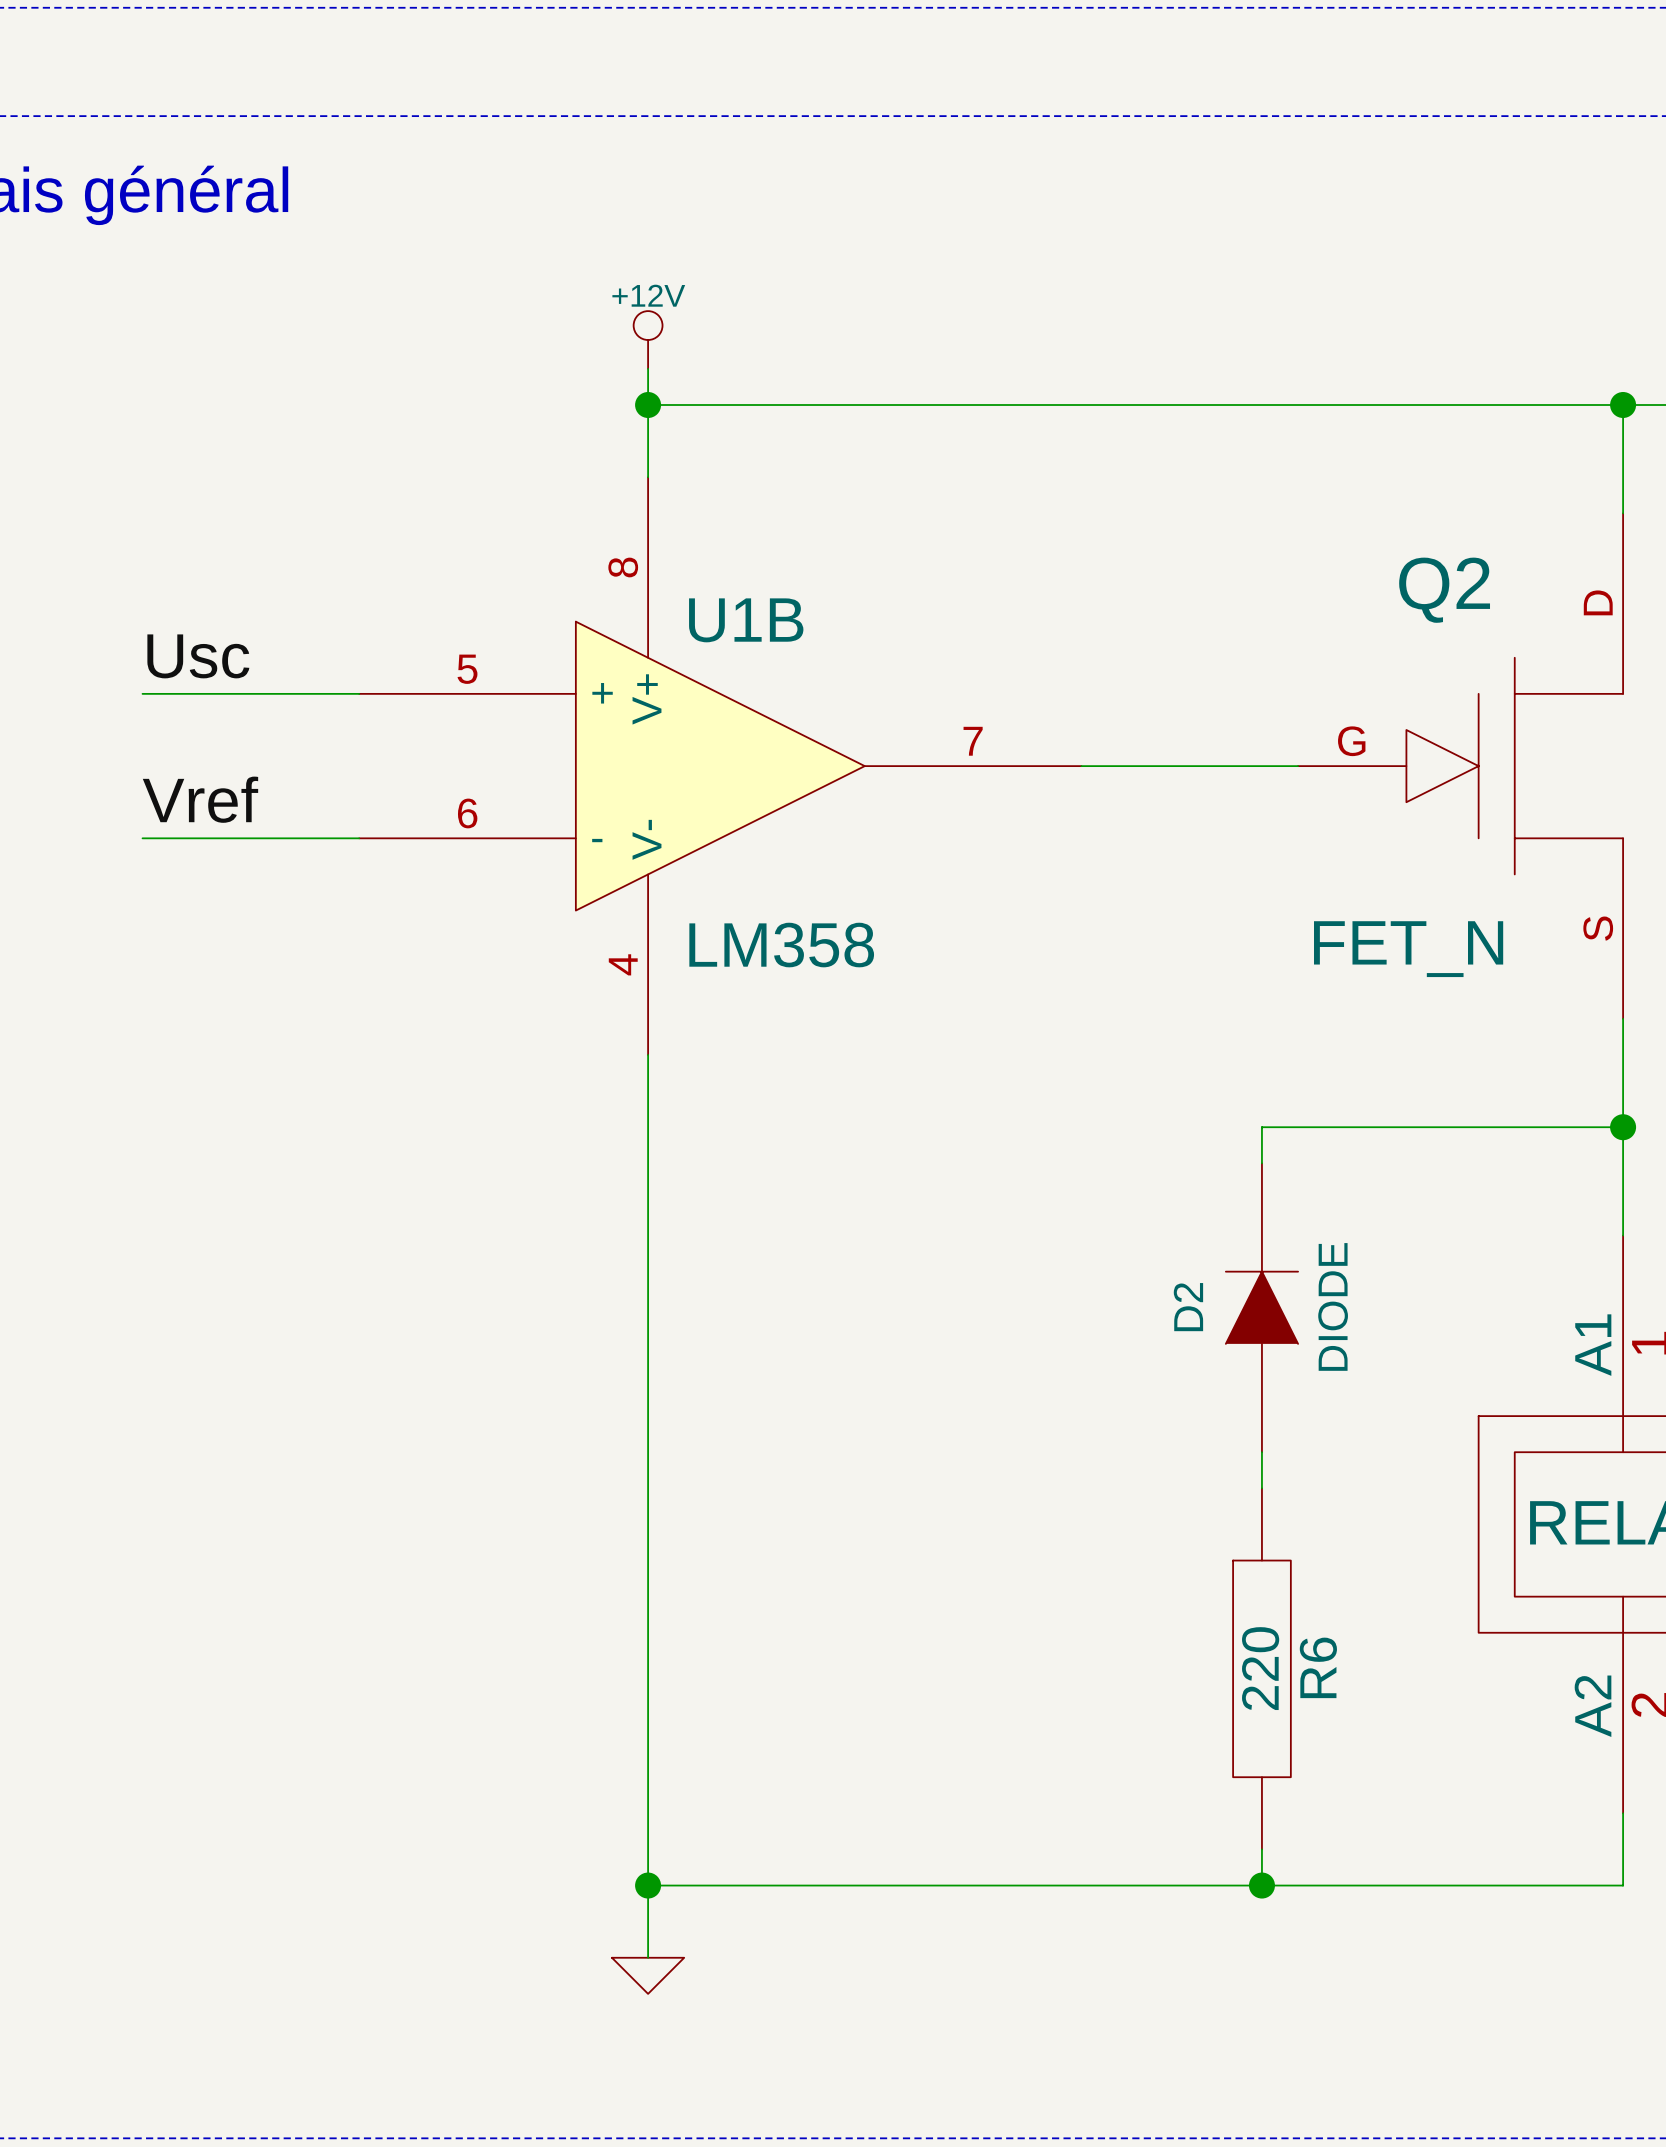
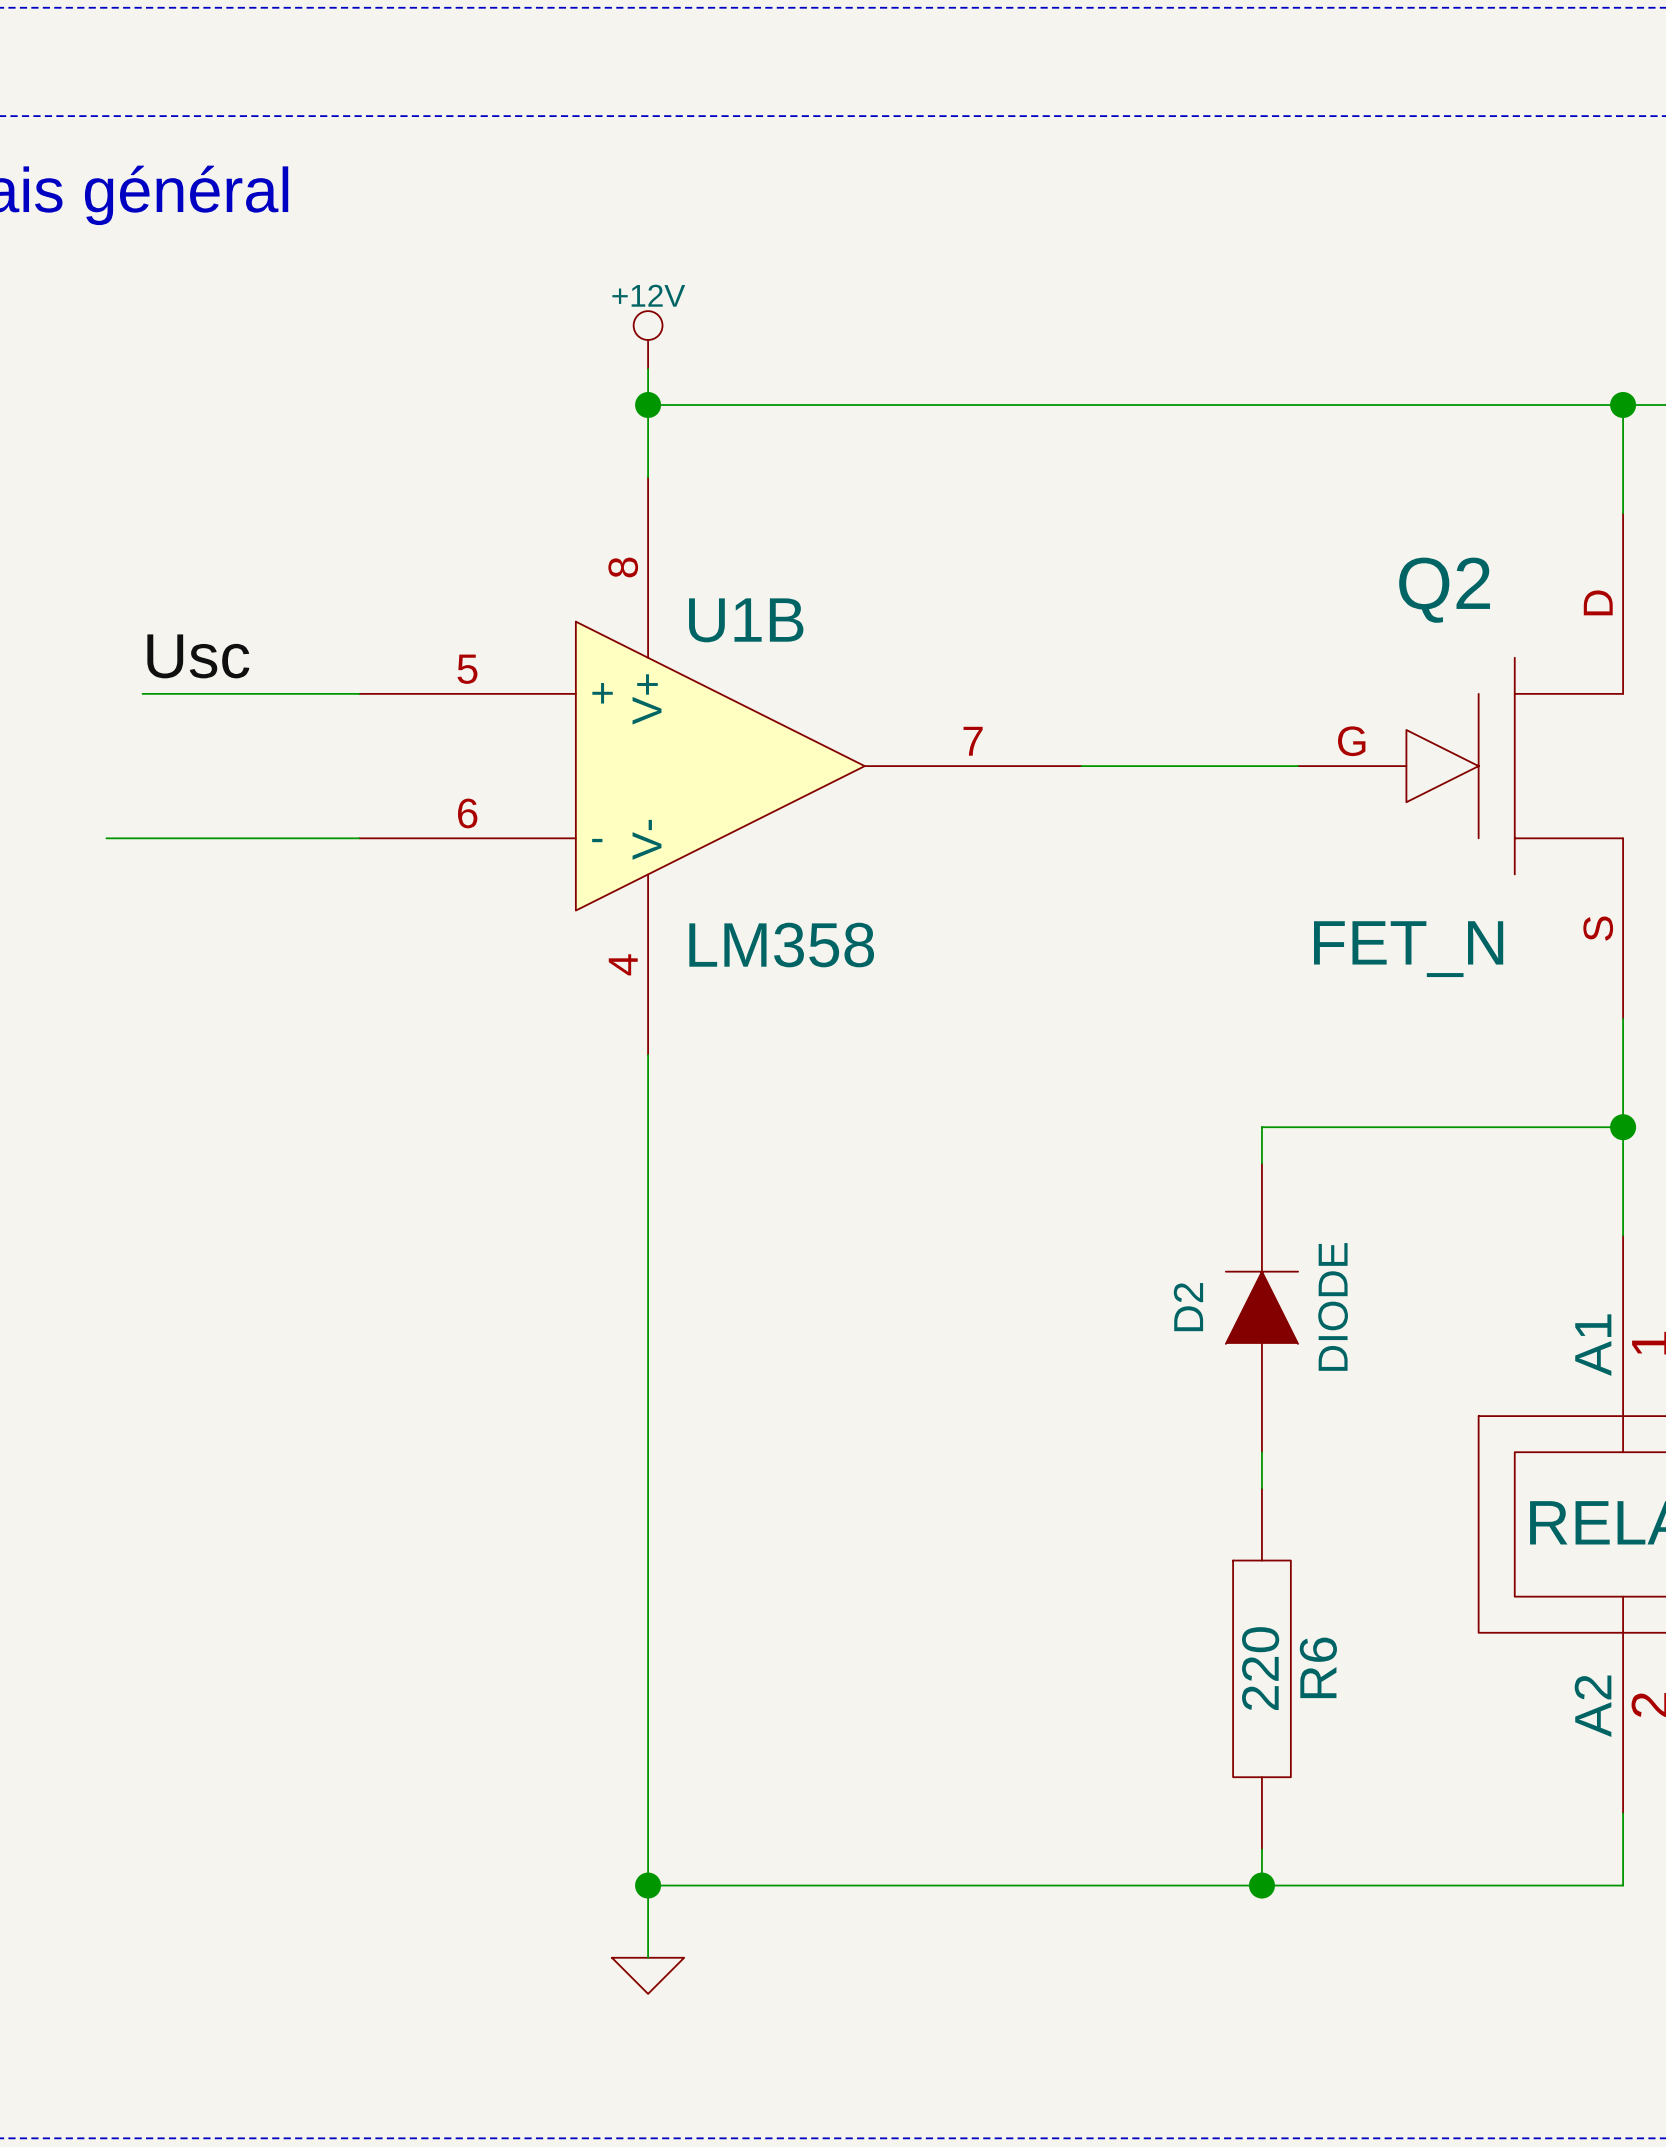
label: Vref (200, 799) -> none
wire: none -> (106, 838) (142, 838)

